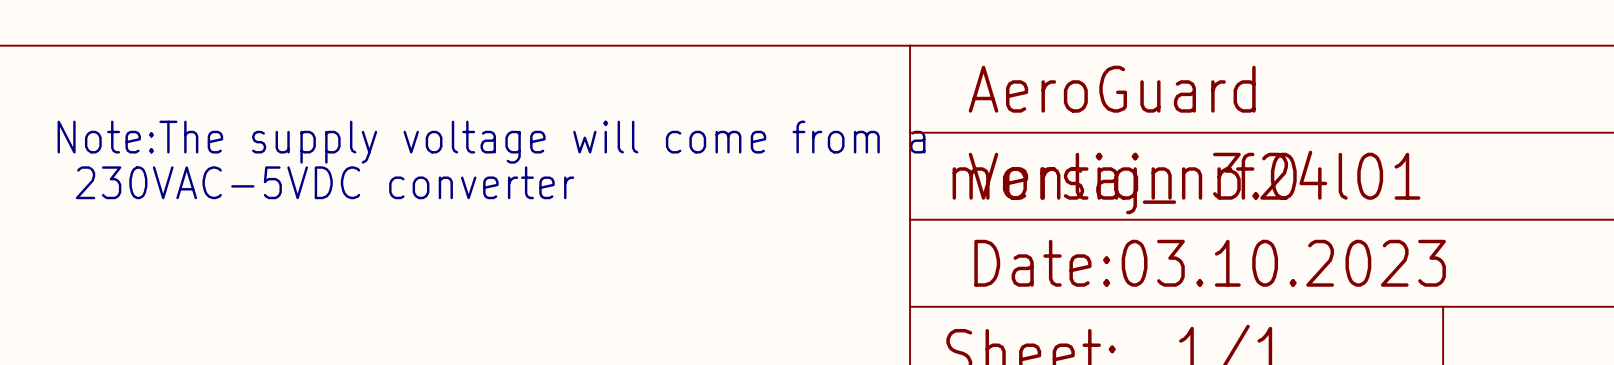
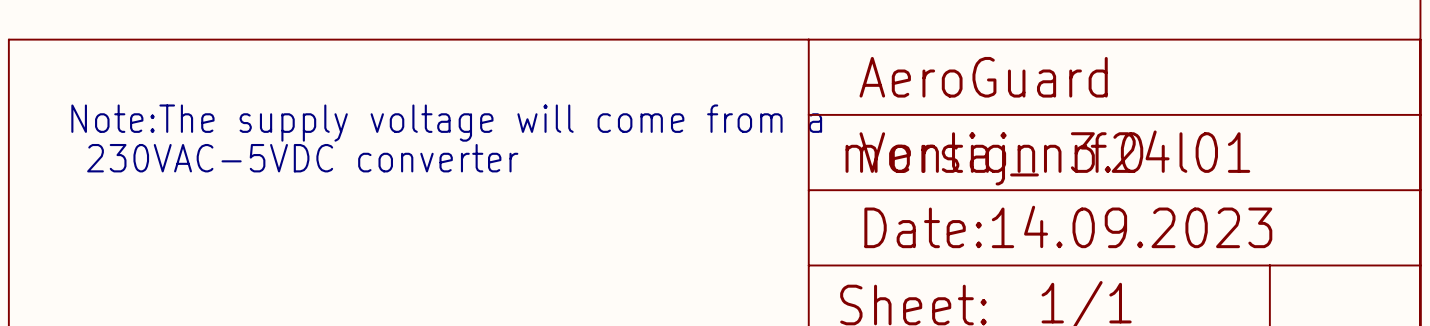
text: Date:03.10.2023 (1210, 263) -> Date:14.09.2023 (1068, 226)

